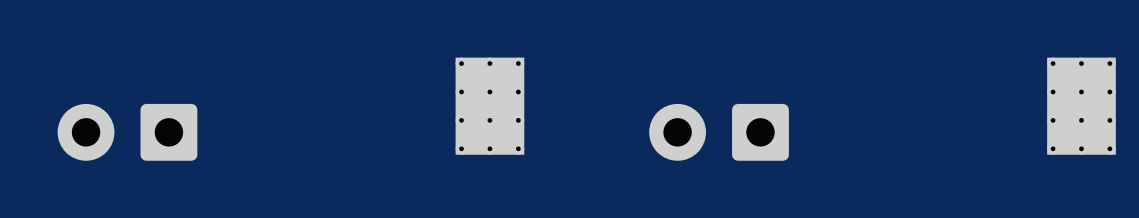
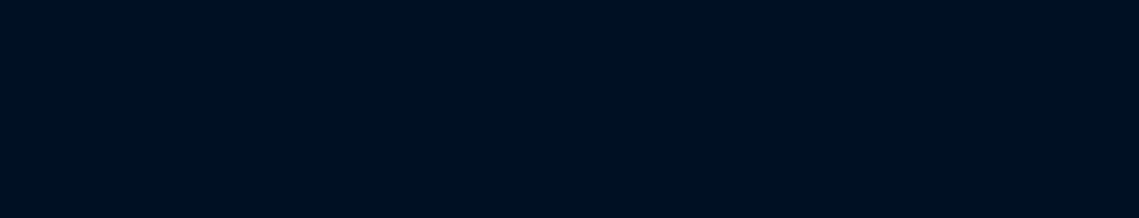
part: (489, 106) -> none
part: (1081, 106) -> none
part: (127, 132) -> none
part: (719, 132) -> none

